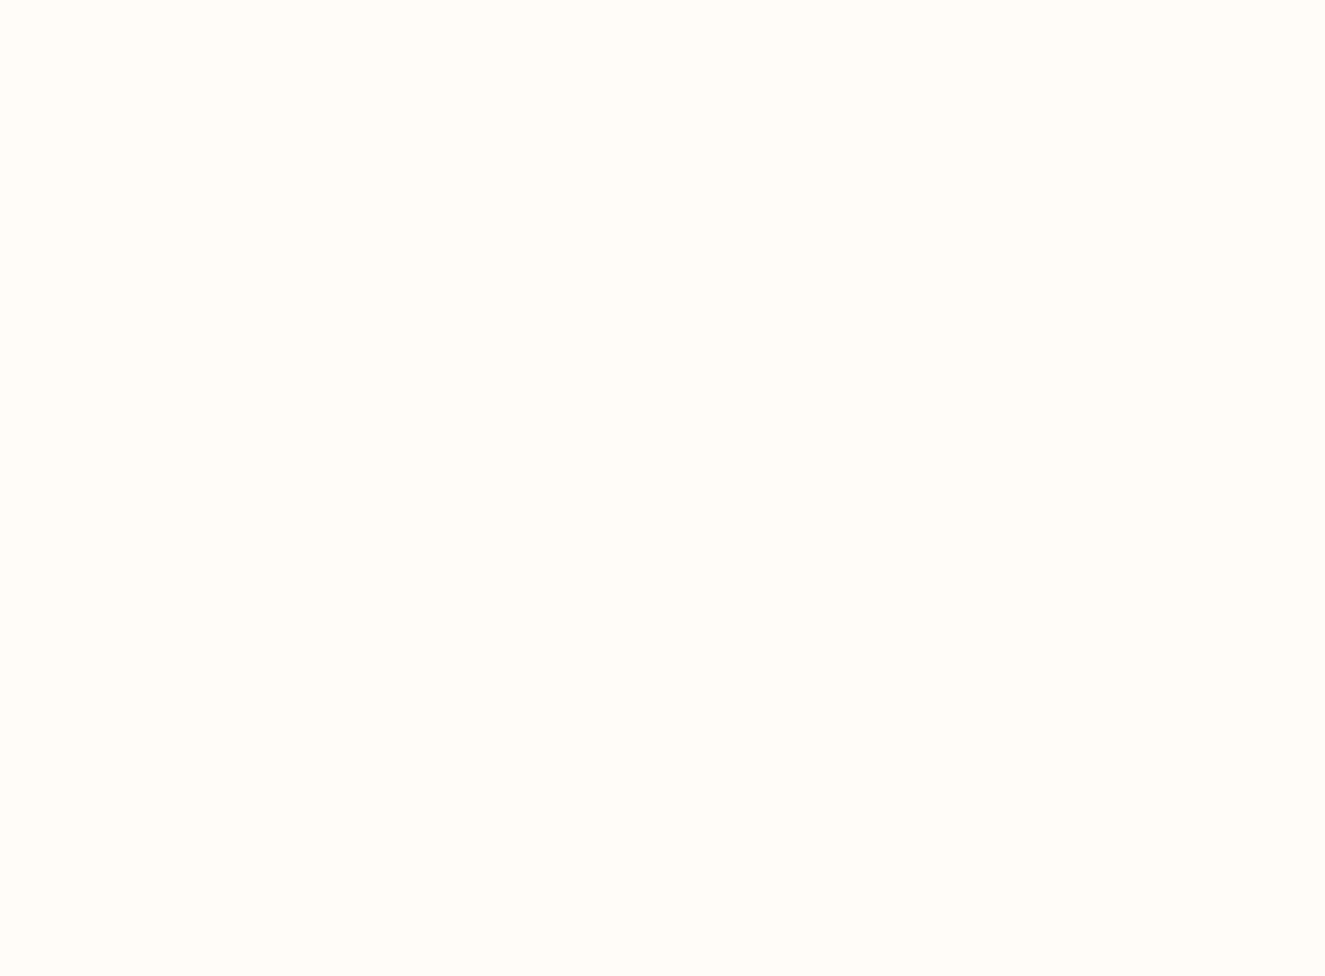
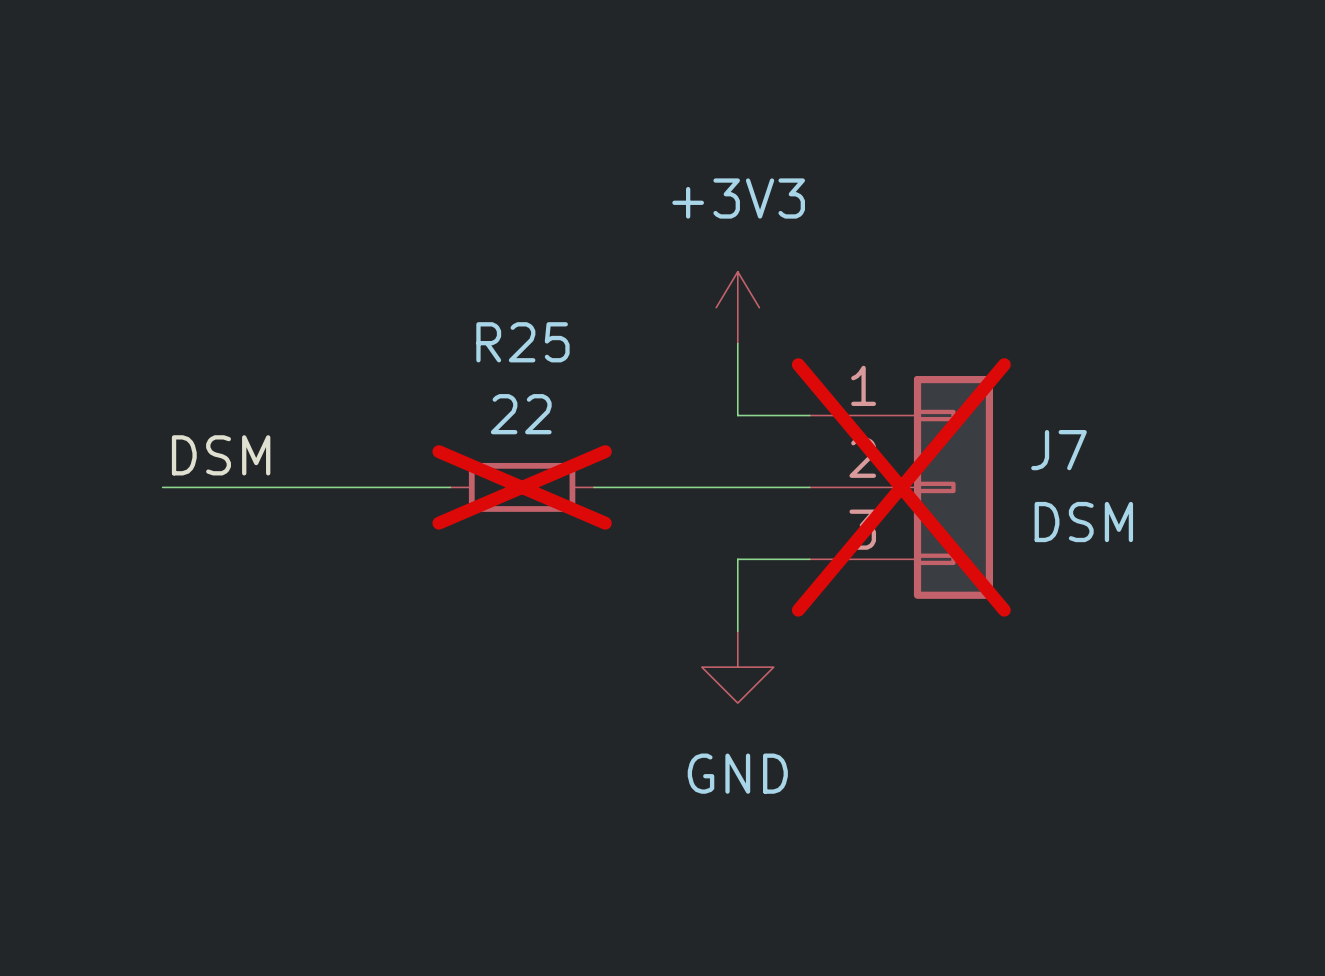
power symbol: none -> +3V3 (737, 307)
wire: none -> (737, 343) (737, 415) (809, 415)
label: none -> DSM (221, 455)
wire: none -> (162, 487) (450, 487)
R25: none -> 22 (522, 487)
wire: none -> (594, 487) (809, 487)
J7: none -> DSM (901, 487)
wire: none -> (809, 559) (737, 559) (737, 631)
power symbol: none -> GND (737, 667)

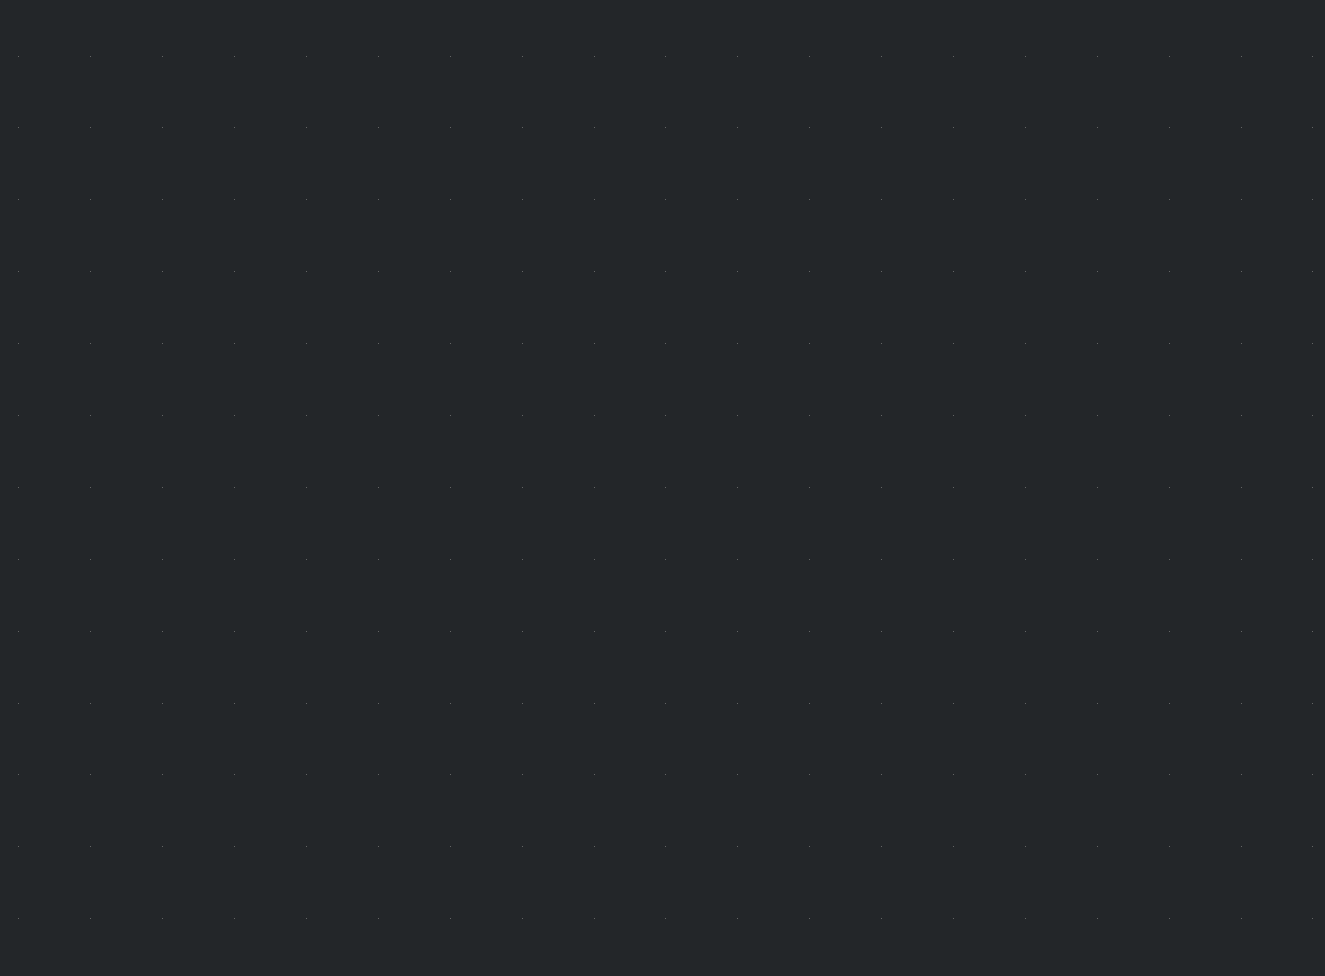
power symbol: +3V3 (737, 307) -> none
wire: (737, 343) (737, 415) (809, 415) -> none
label: DSM (221, 455) -> none
wire: (162, 487) (450, 487) -> none
R25: 22 (522, 487) -> none
wire: (594, 487) (809, 487) -> none
J7: DSM (901, 487) -> none
wire: (809, 559) (737, 559) (737, 631) -> none
power symbol: GND (737, 667) -> none

